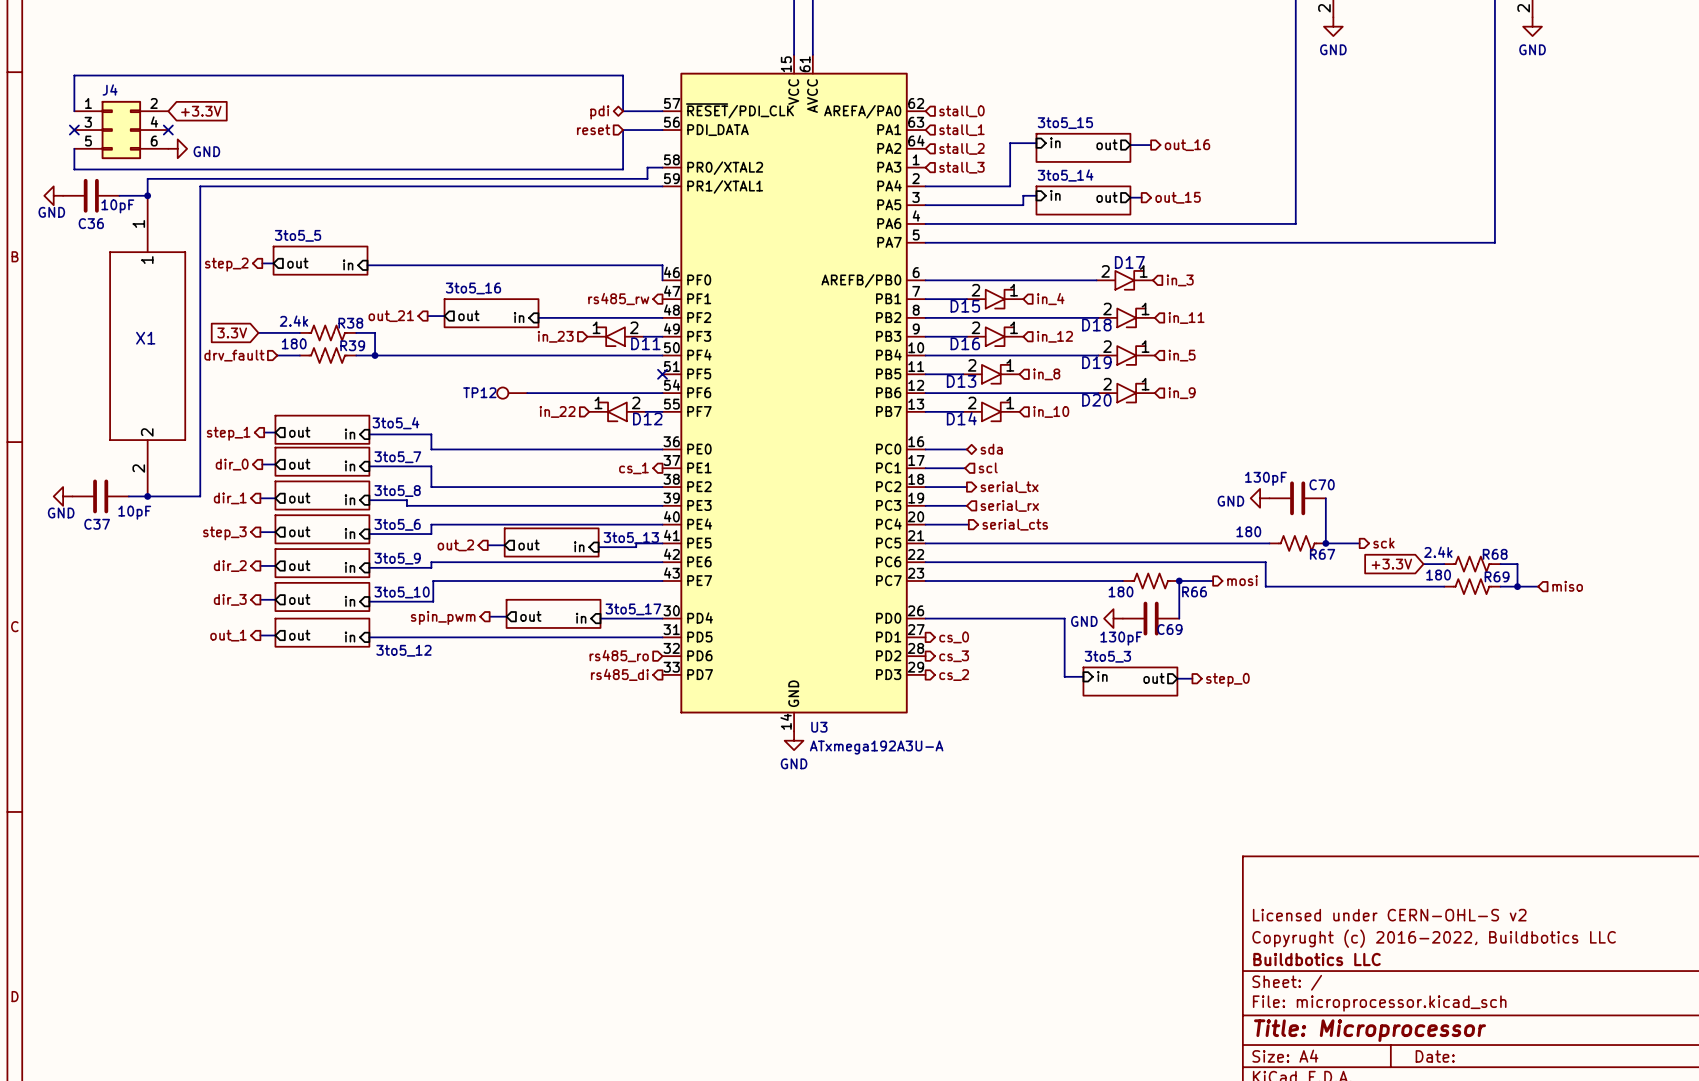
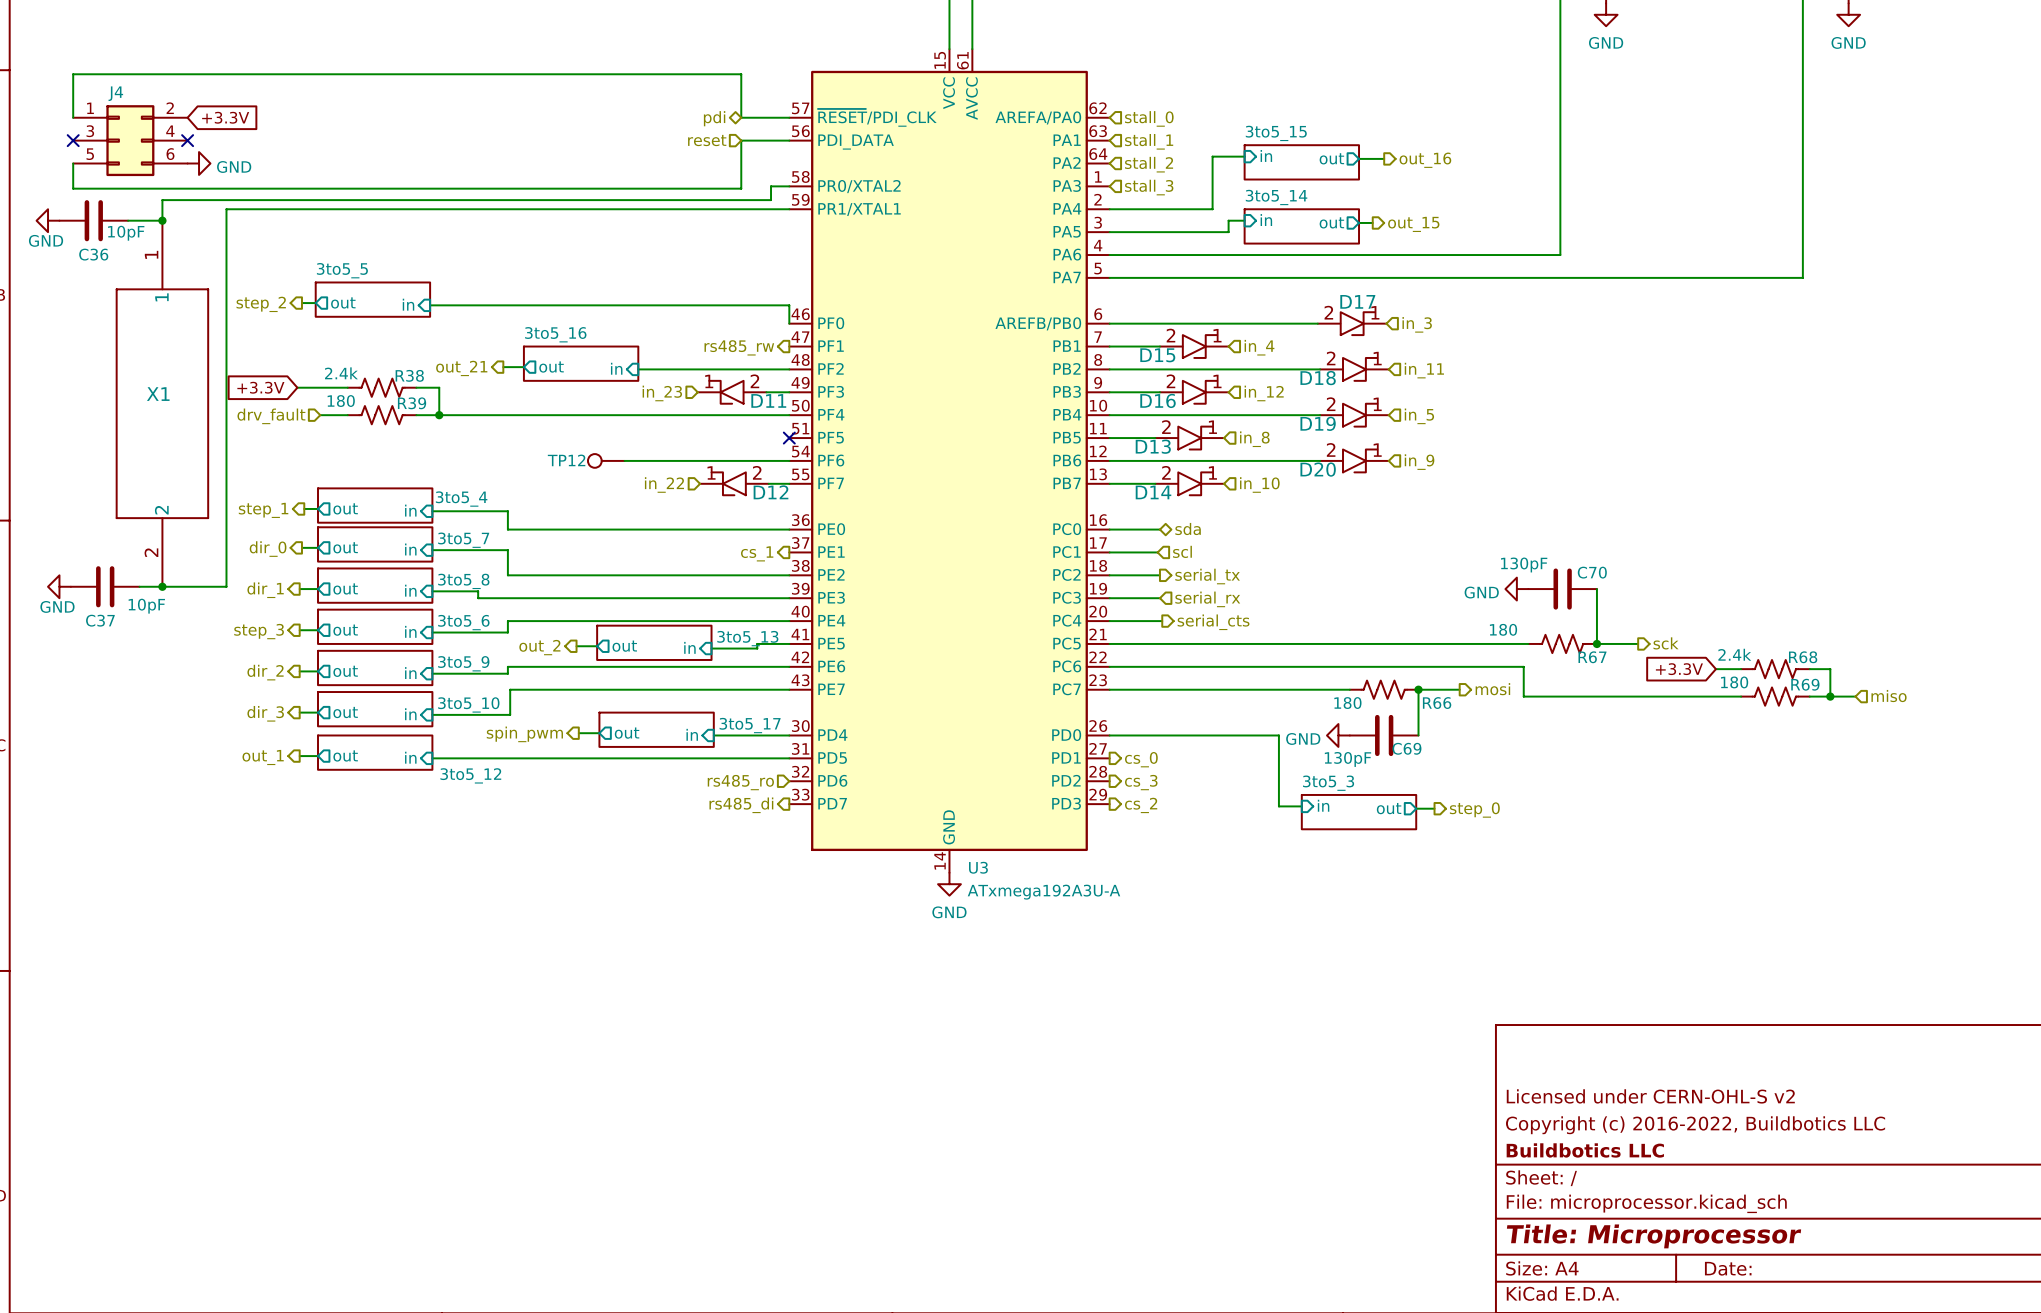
global label: 3.3V (232, 332) -> +3.3V (260, 387)
title block: Copyrught (c) 2016-2022, Buildbotics LLC (1434, 938) -> Copyright (c) 2016-2022, Buildbotics LLC (1695, 1125)

